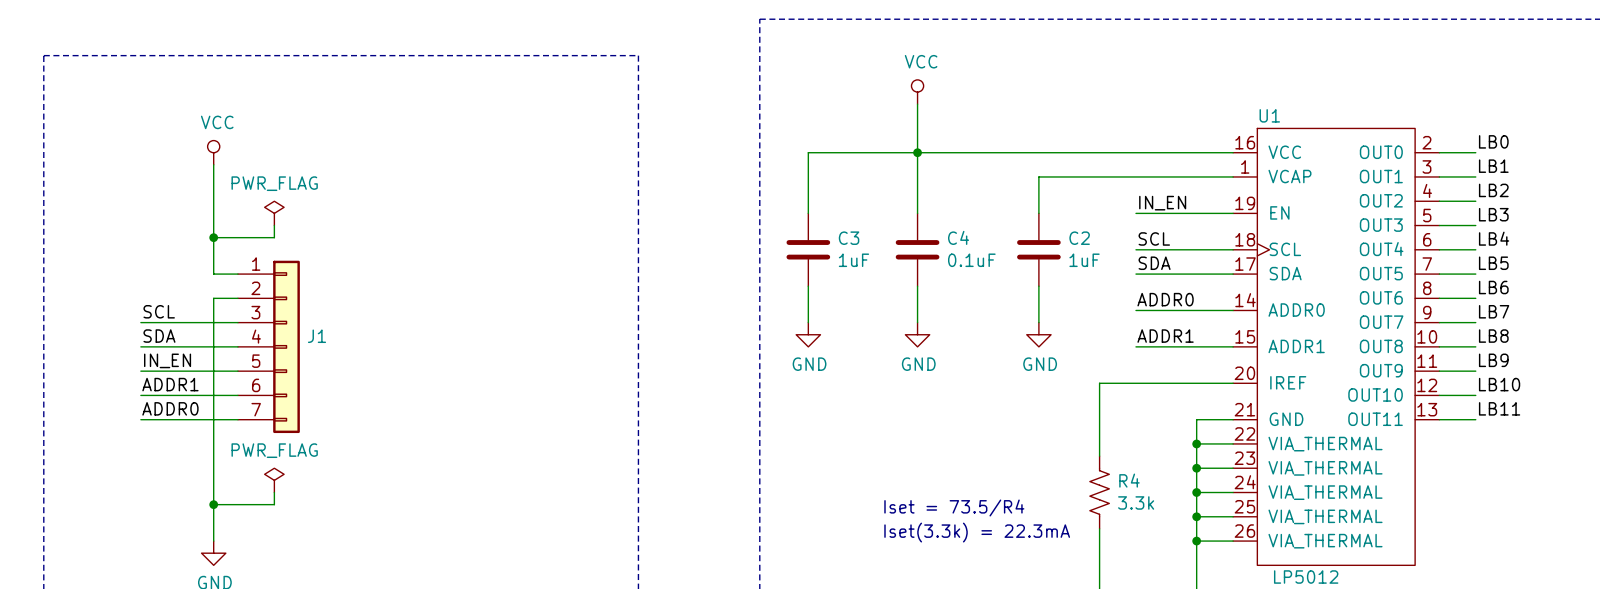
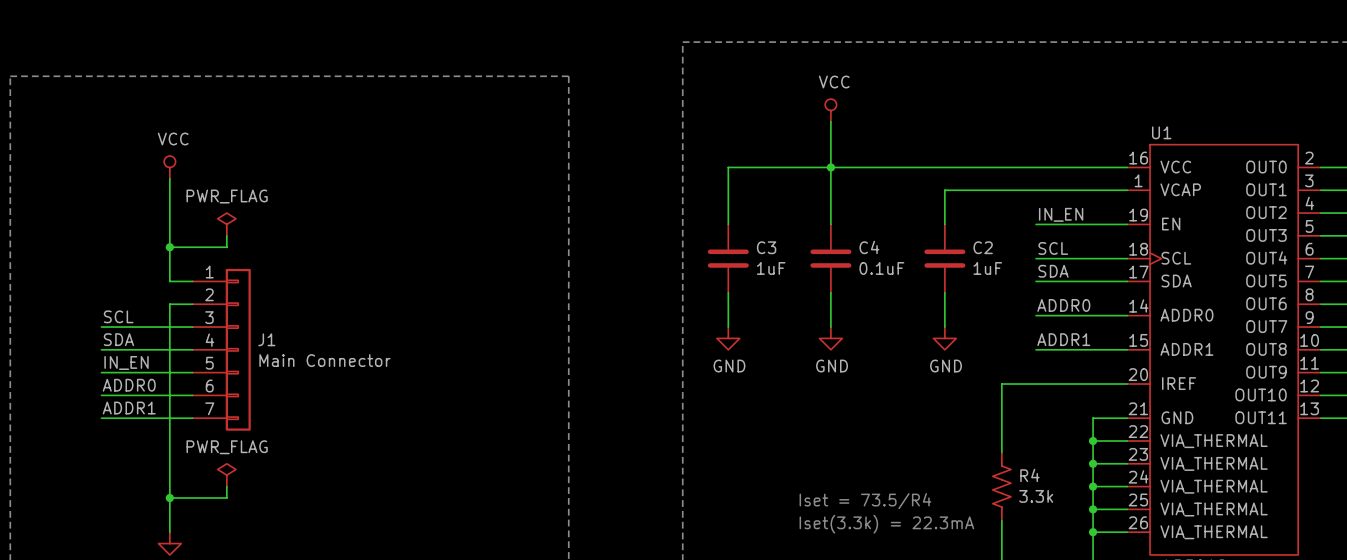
J1 value: none -> Main Connector (324, 360)
label: ADDR1 (170, 384) -> ADDR0 (129, 385)
label: ADDR0 (170, 408) -> ADDR1 (129, 408)

